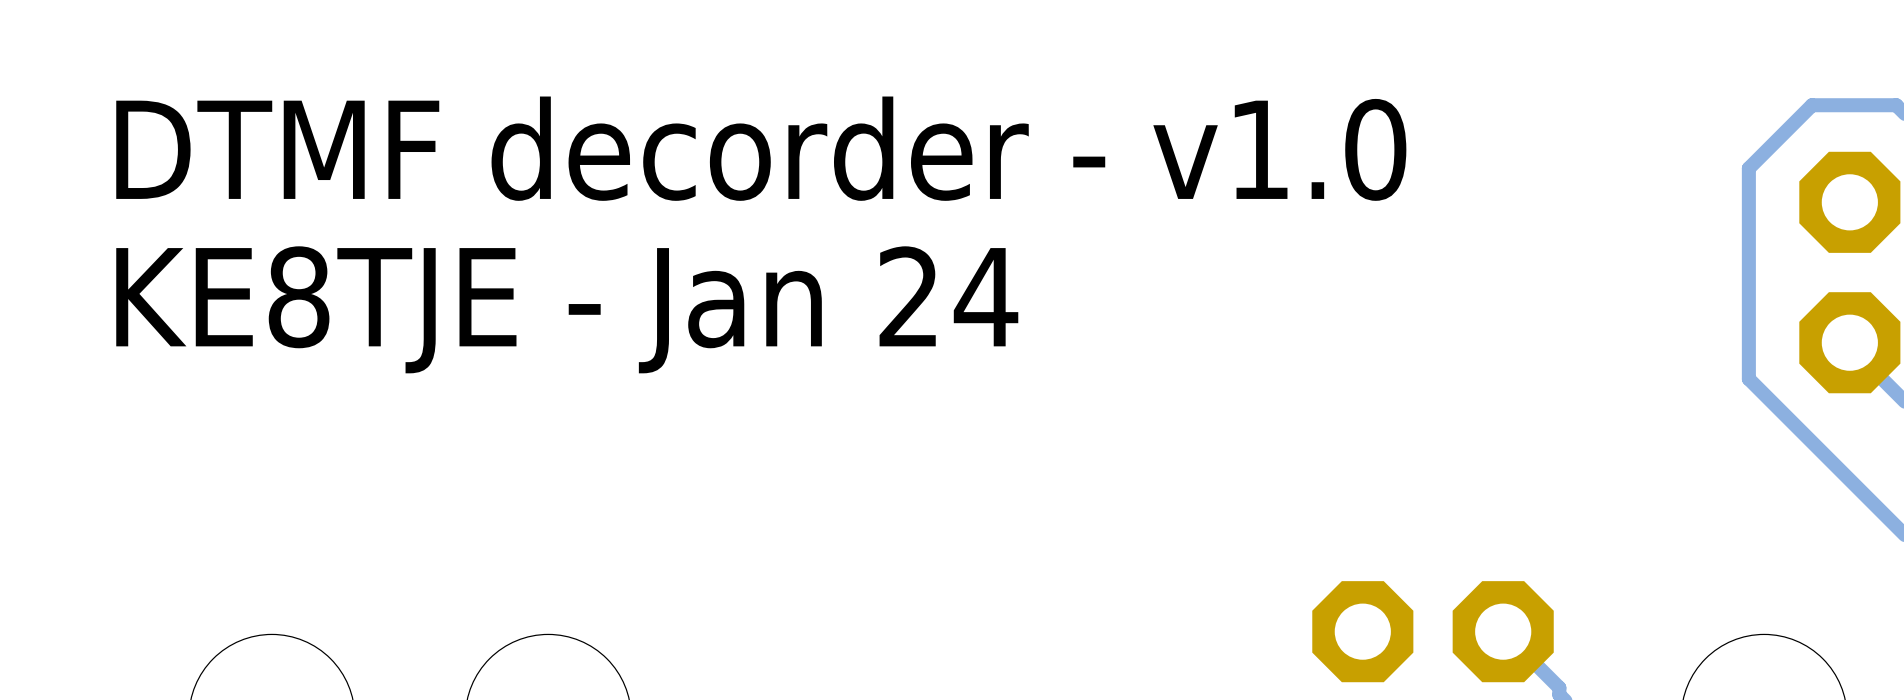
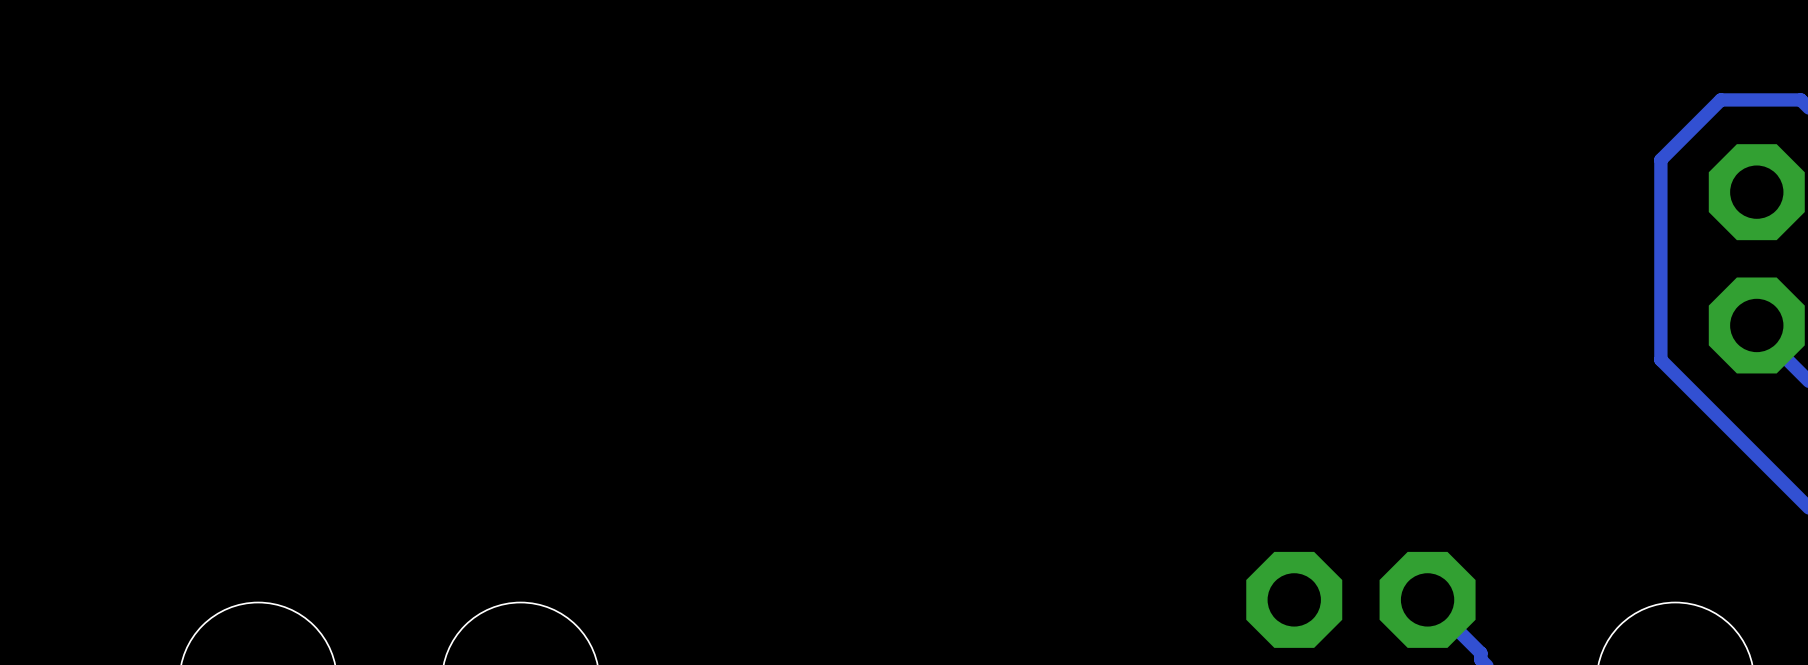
text: DTMF decorder - v1.0 (761, 148) -> none
text: KE8TJE - Jan 24 (567, 309) -> none

